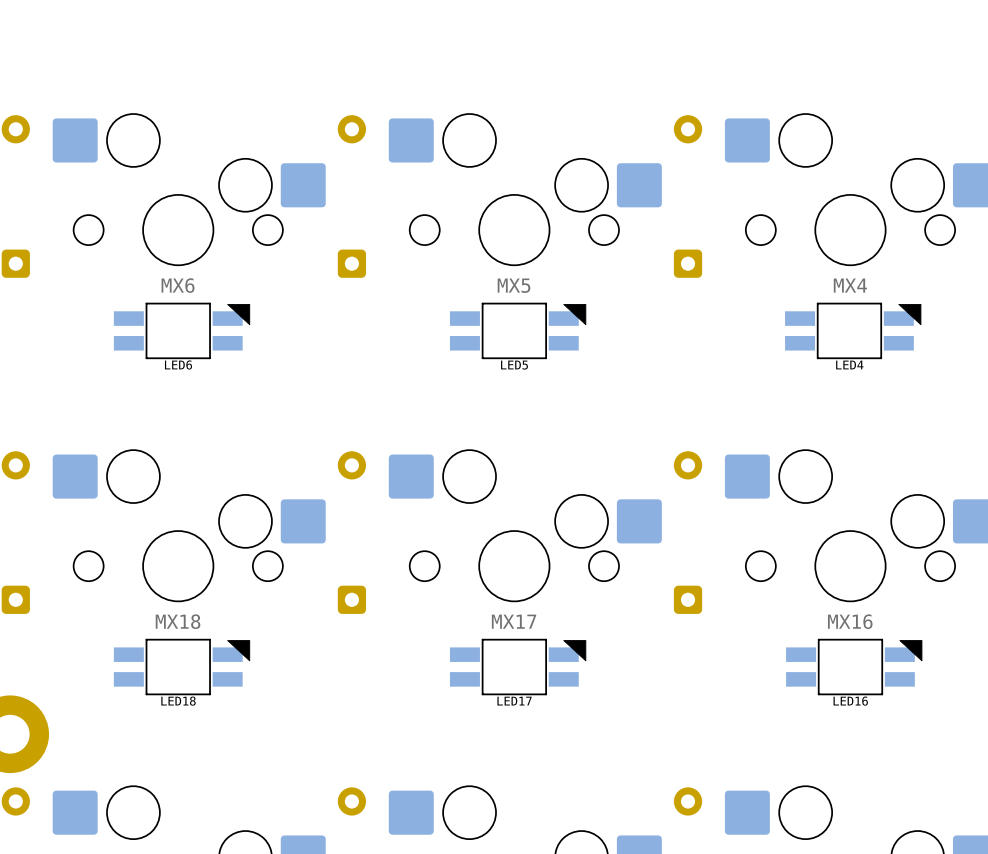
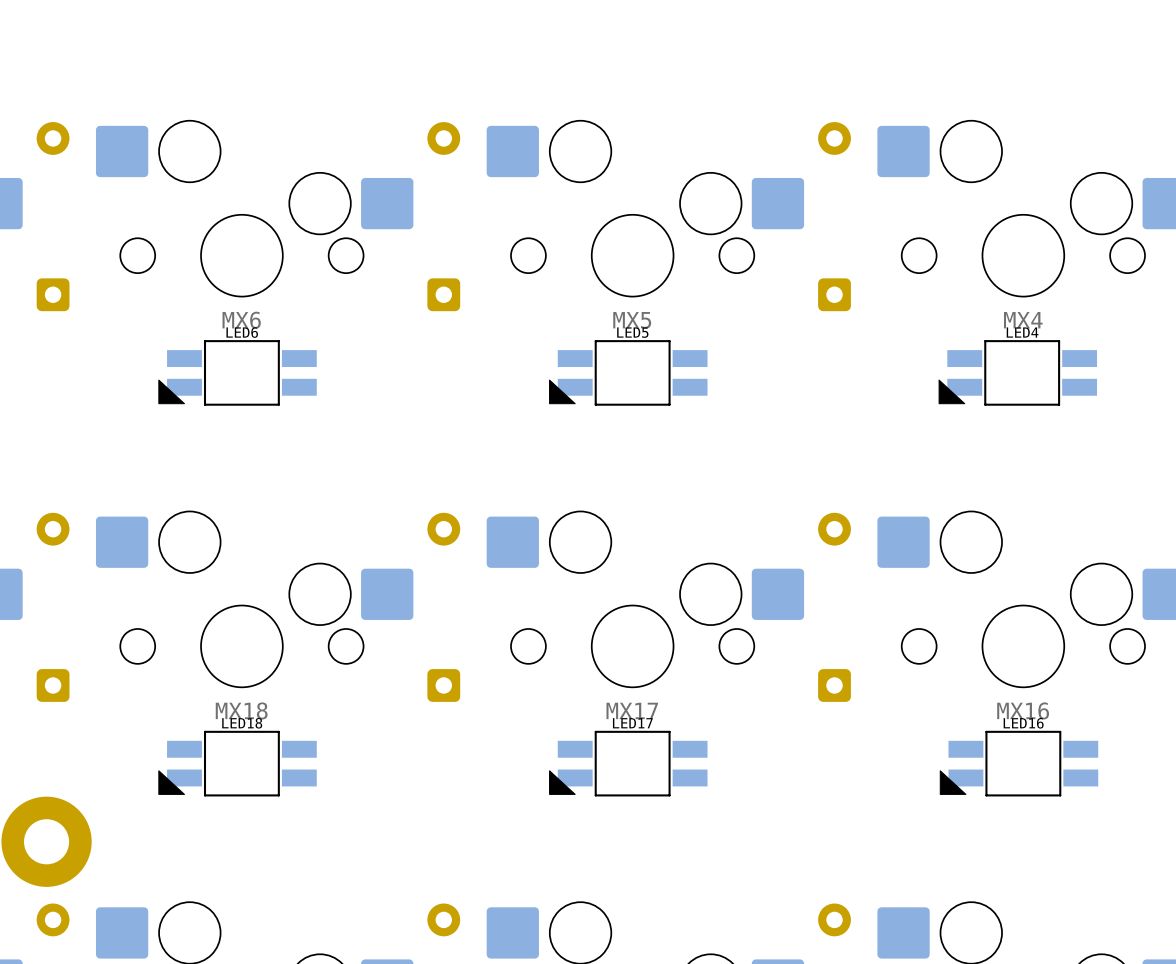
LED6 rotation: 0° (182, 330) -> 180° (237, 372)
LED5 rotation: 0° (518, 330) -> 180° (628, 372)
LED4 rotation: 0° (853, 330) -> 180° (1017, 372)
LED18 rotation: 0° (182, 667) -> 180° (237, 763)
LED17 rotation: 0° (518, 667) -> 180° (628, 763)
LED16 rotation: 0° (854, 667) -> 180° (1019, 763)

